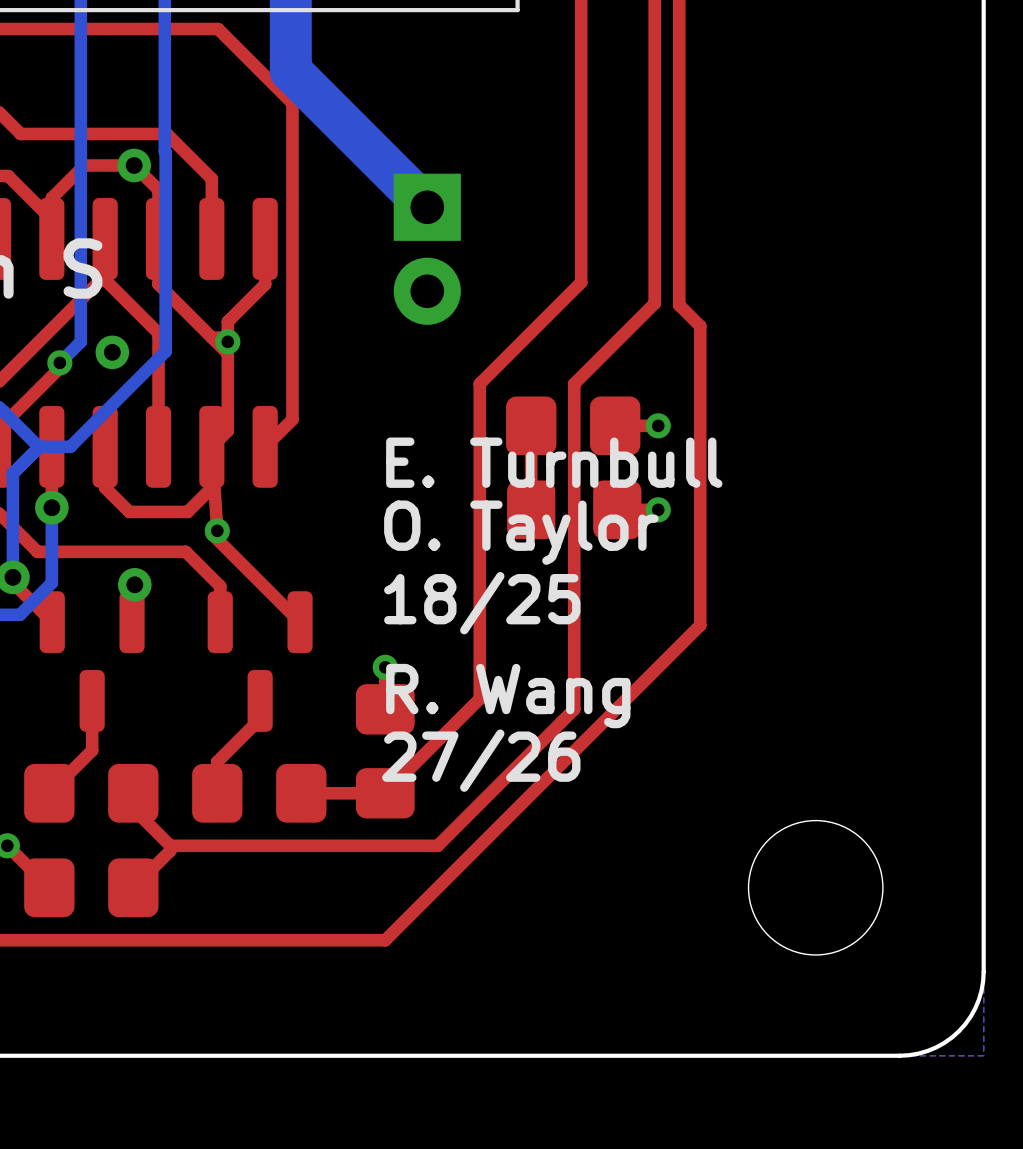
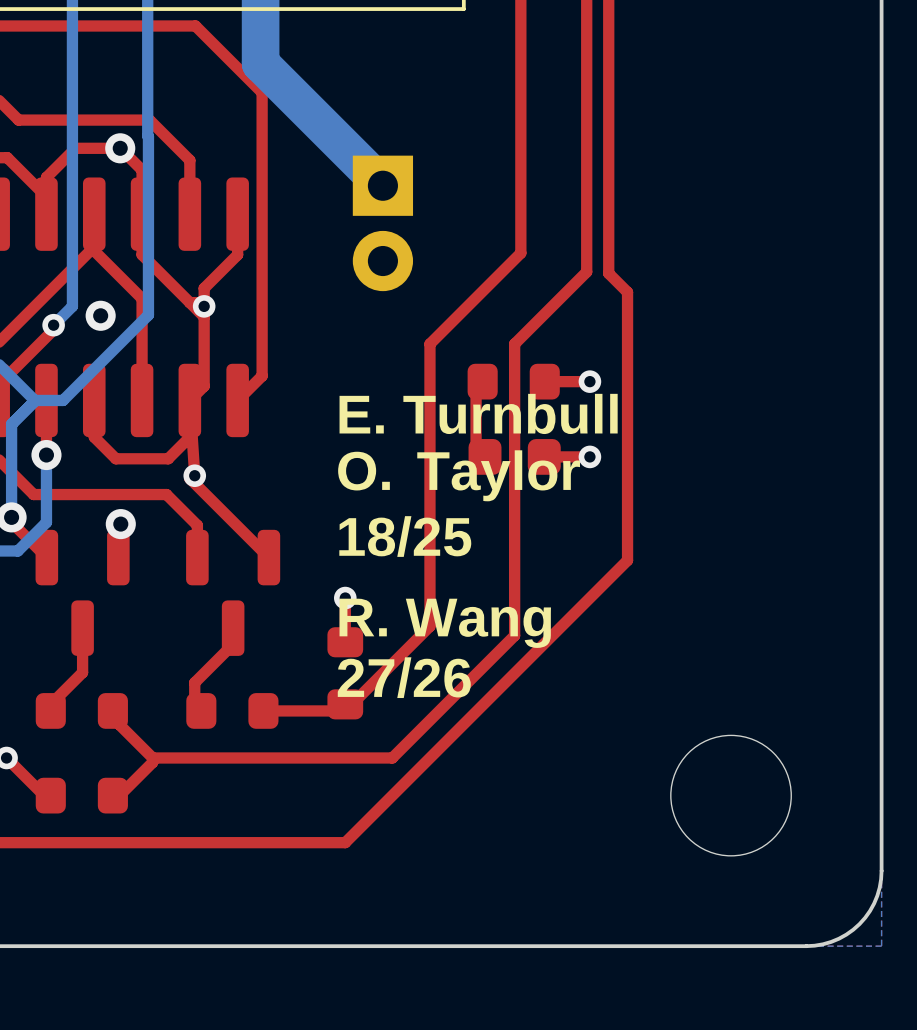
part footprint: [506, 396, 641, 456] -> [467, 363, 560, 400]
part footprint: [507, 480, 642, 540] -> [468, 439, 561, 475]
part footprint: [355, 684, 415, 819] -> [327, 627, 364, 720]
part footprint: [24, 763, 159, 823] -> [35, 693, 128, 729]
part footprint: [192, 763, 327, 823] -> [186, 693, 279, 729]
part footprint: [24, 858, 159, 918] -> [35, 777, 128, 814]

